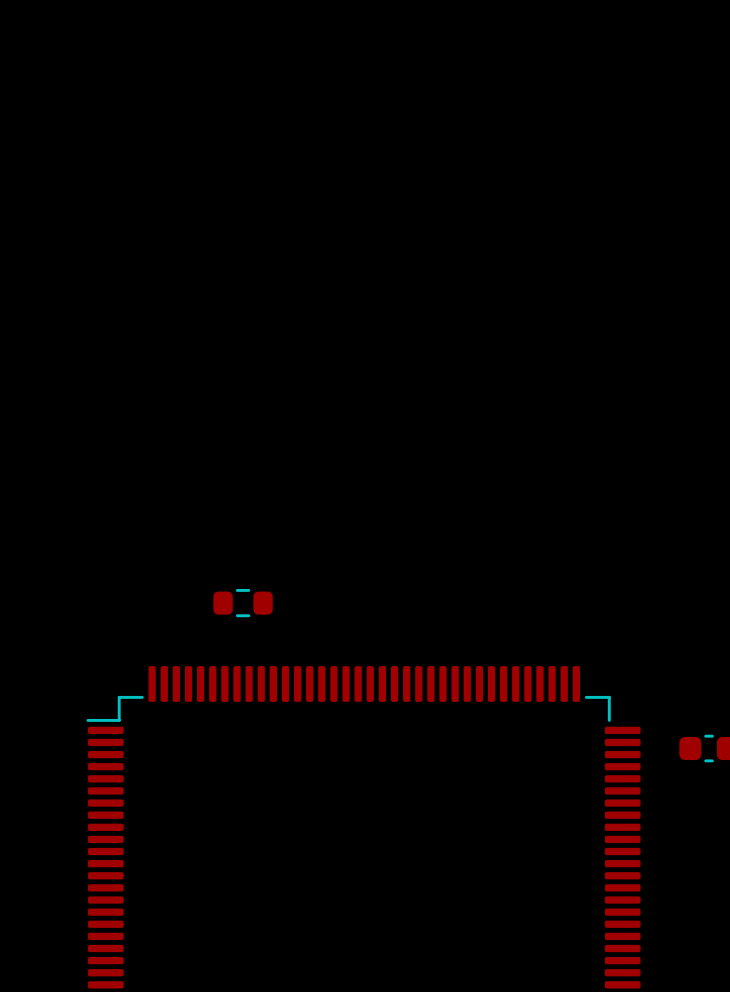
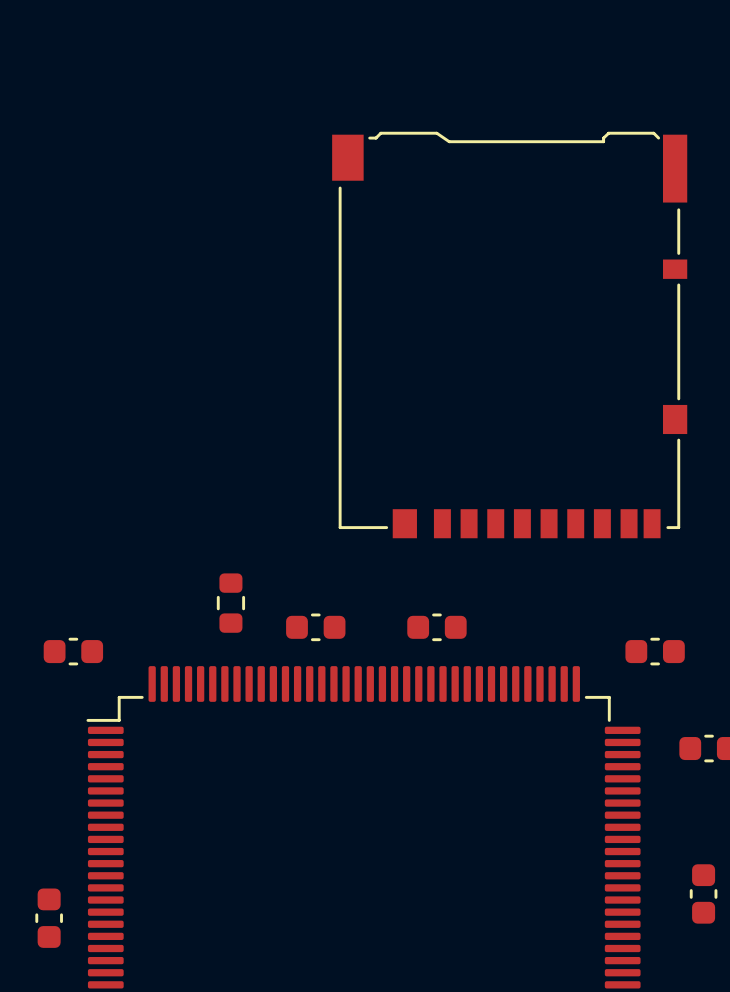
part: none -> (509, 335)
part rotation: 0° (243, 603) -> 90° clockwise (230, 603)
part: none -> (315, 627)
part: none -> (436, 627)
part: none -> (73, 651)
part: none -> (655, 651)
part: none -> (703, 893)
part: none -> (49, 918)

